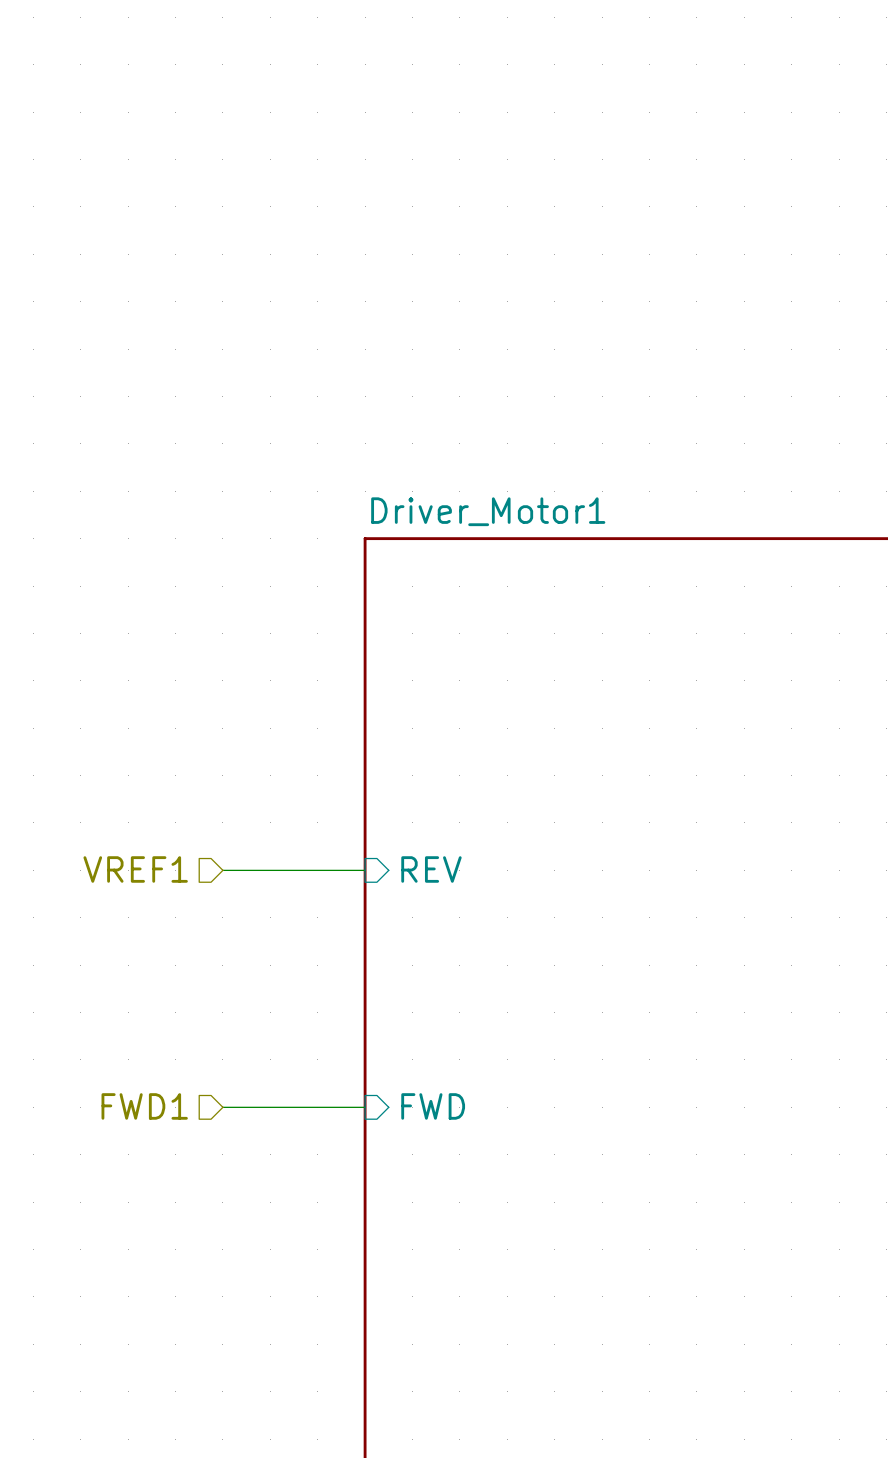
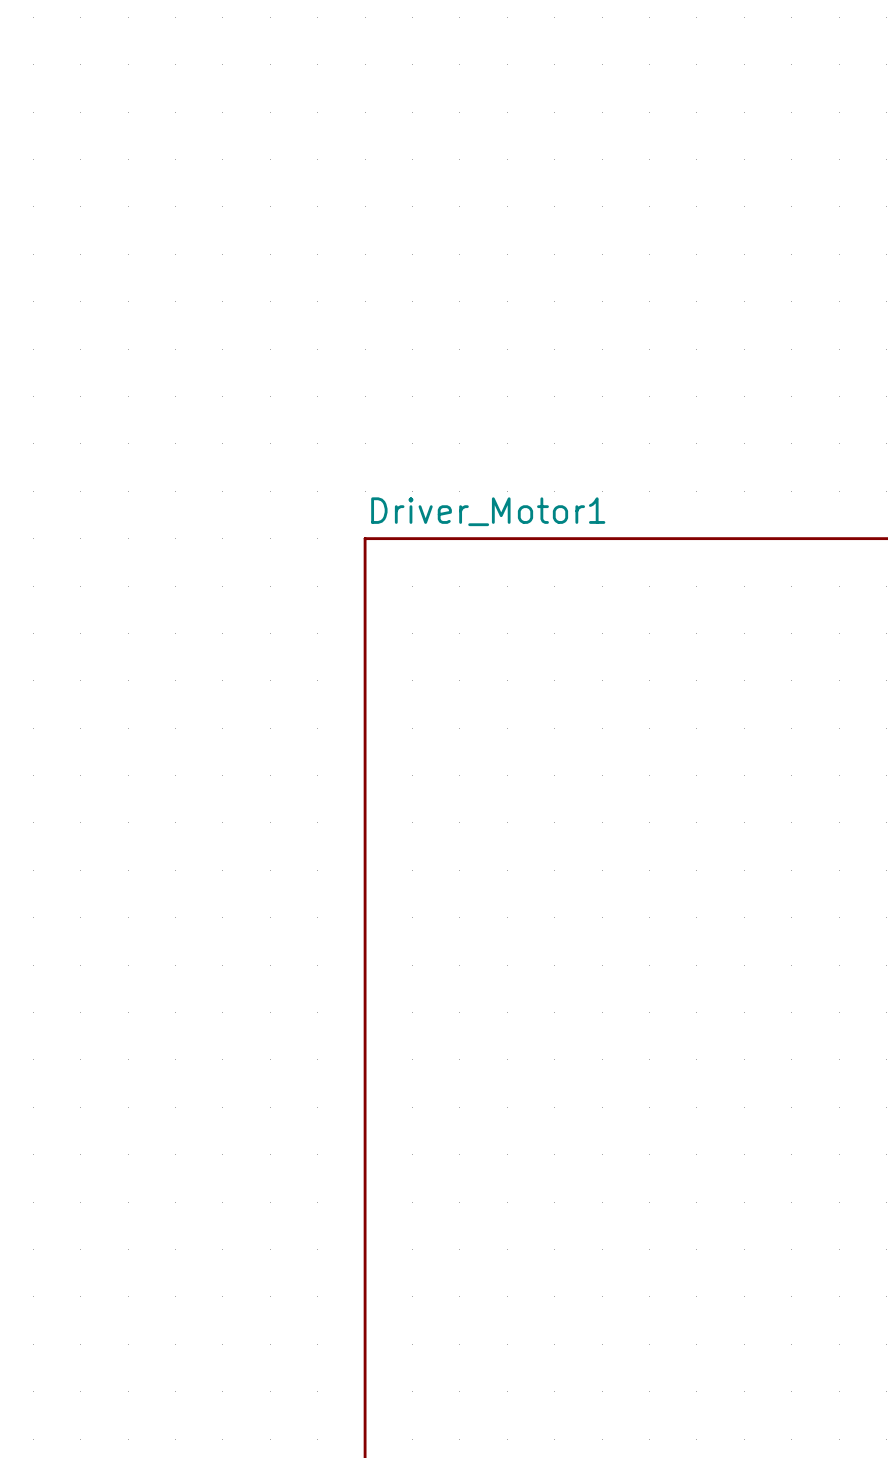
hierarchical label: VREF1 (135, 869) -> none
sheet pin: REV (431, 869) -> none
wire: (222, 870) (365, 870) -> none
hierarchical label: FWD1 (144, 1106) -> none
sheet pin: FWD (433, 1106) -> none
wire: (222, 1107) (365, 1107) -> none

